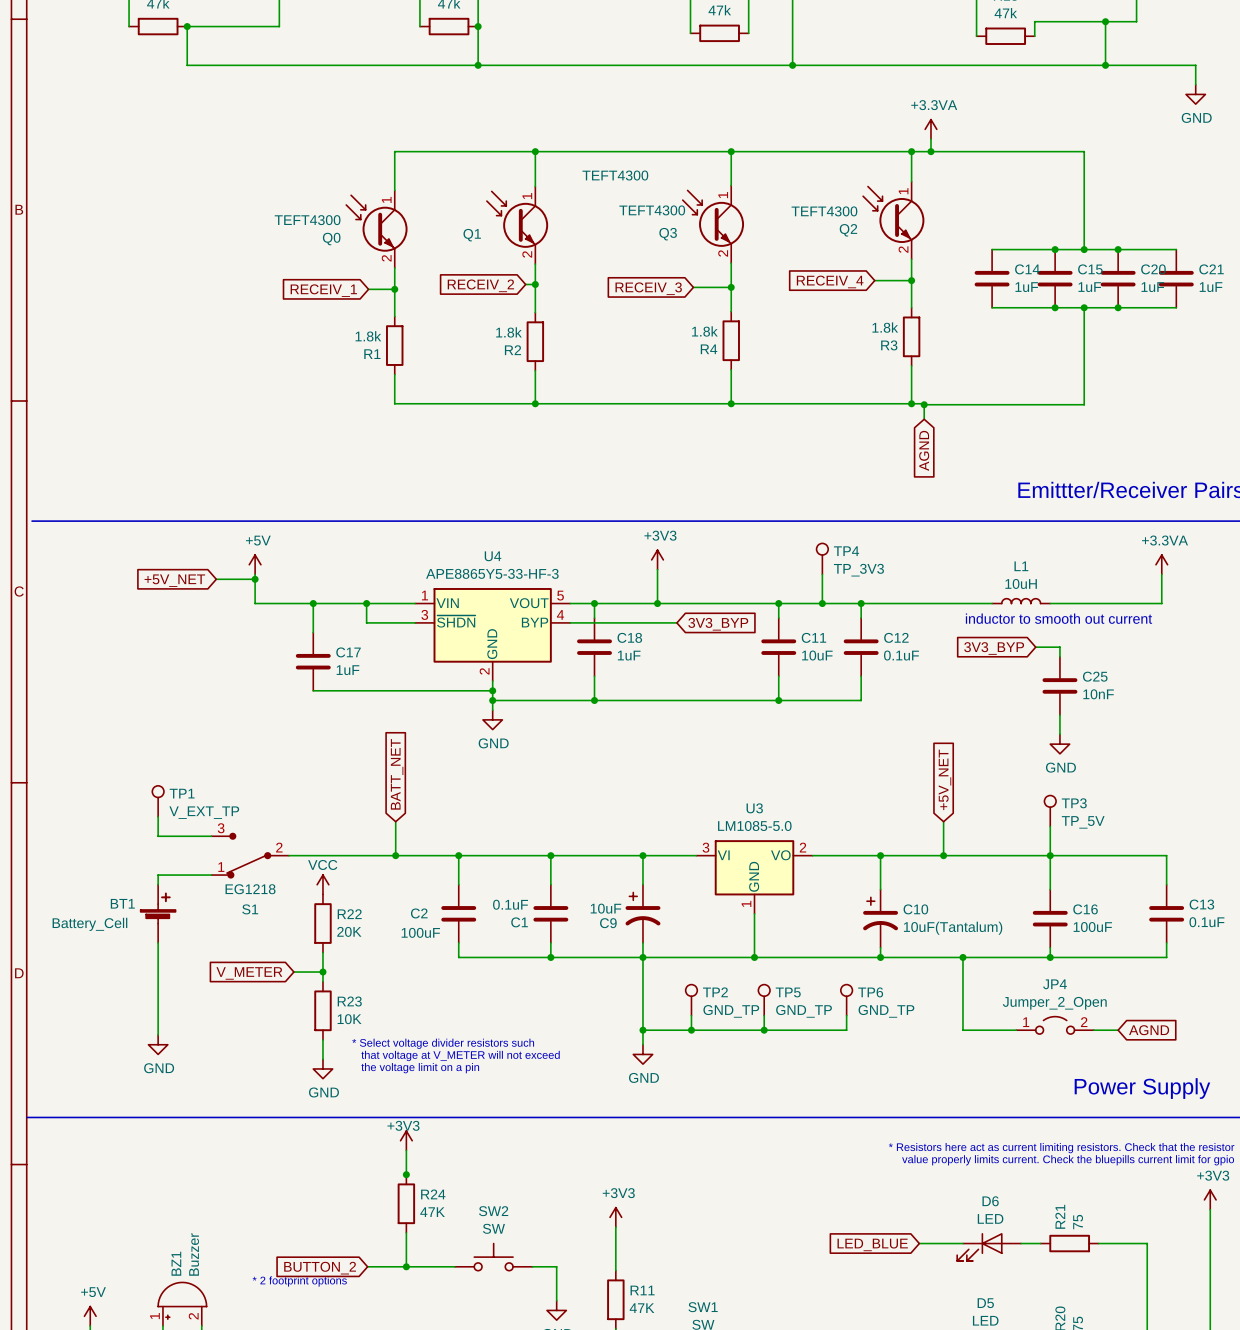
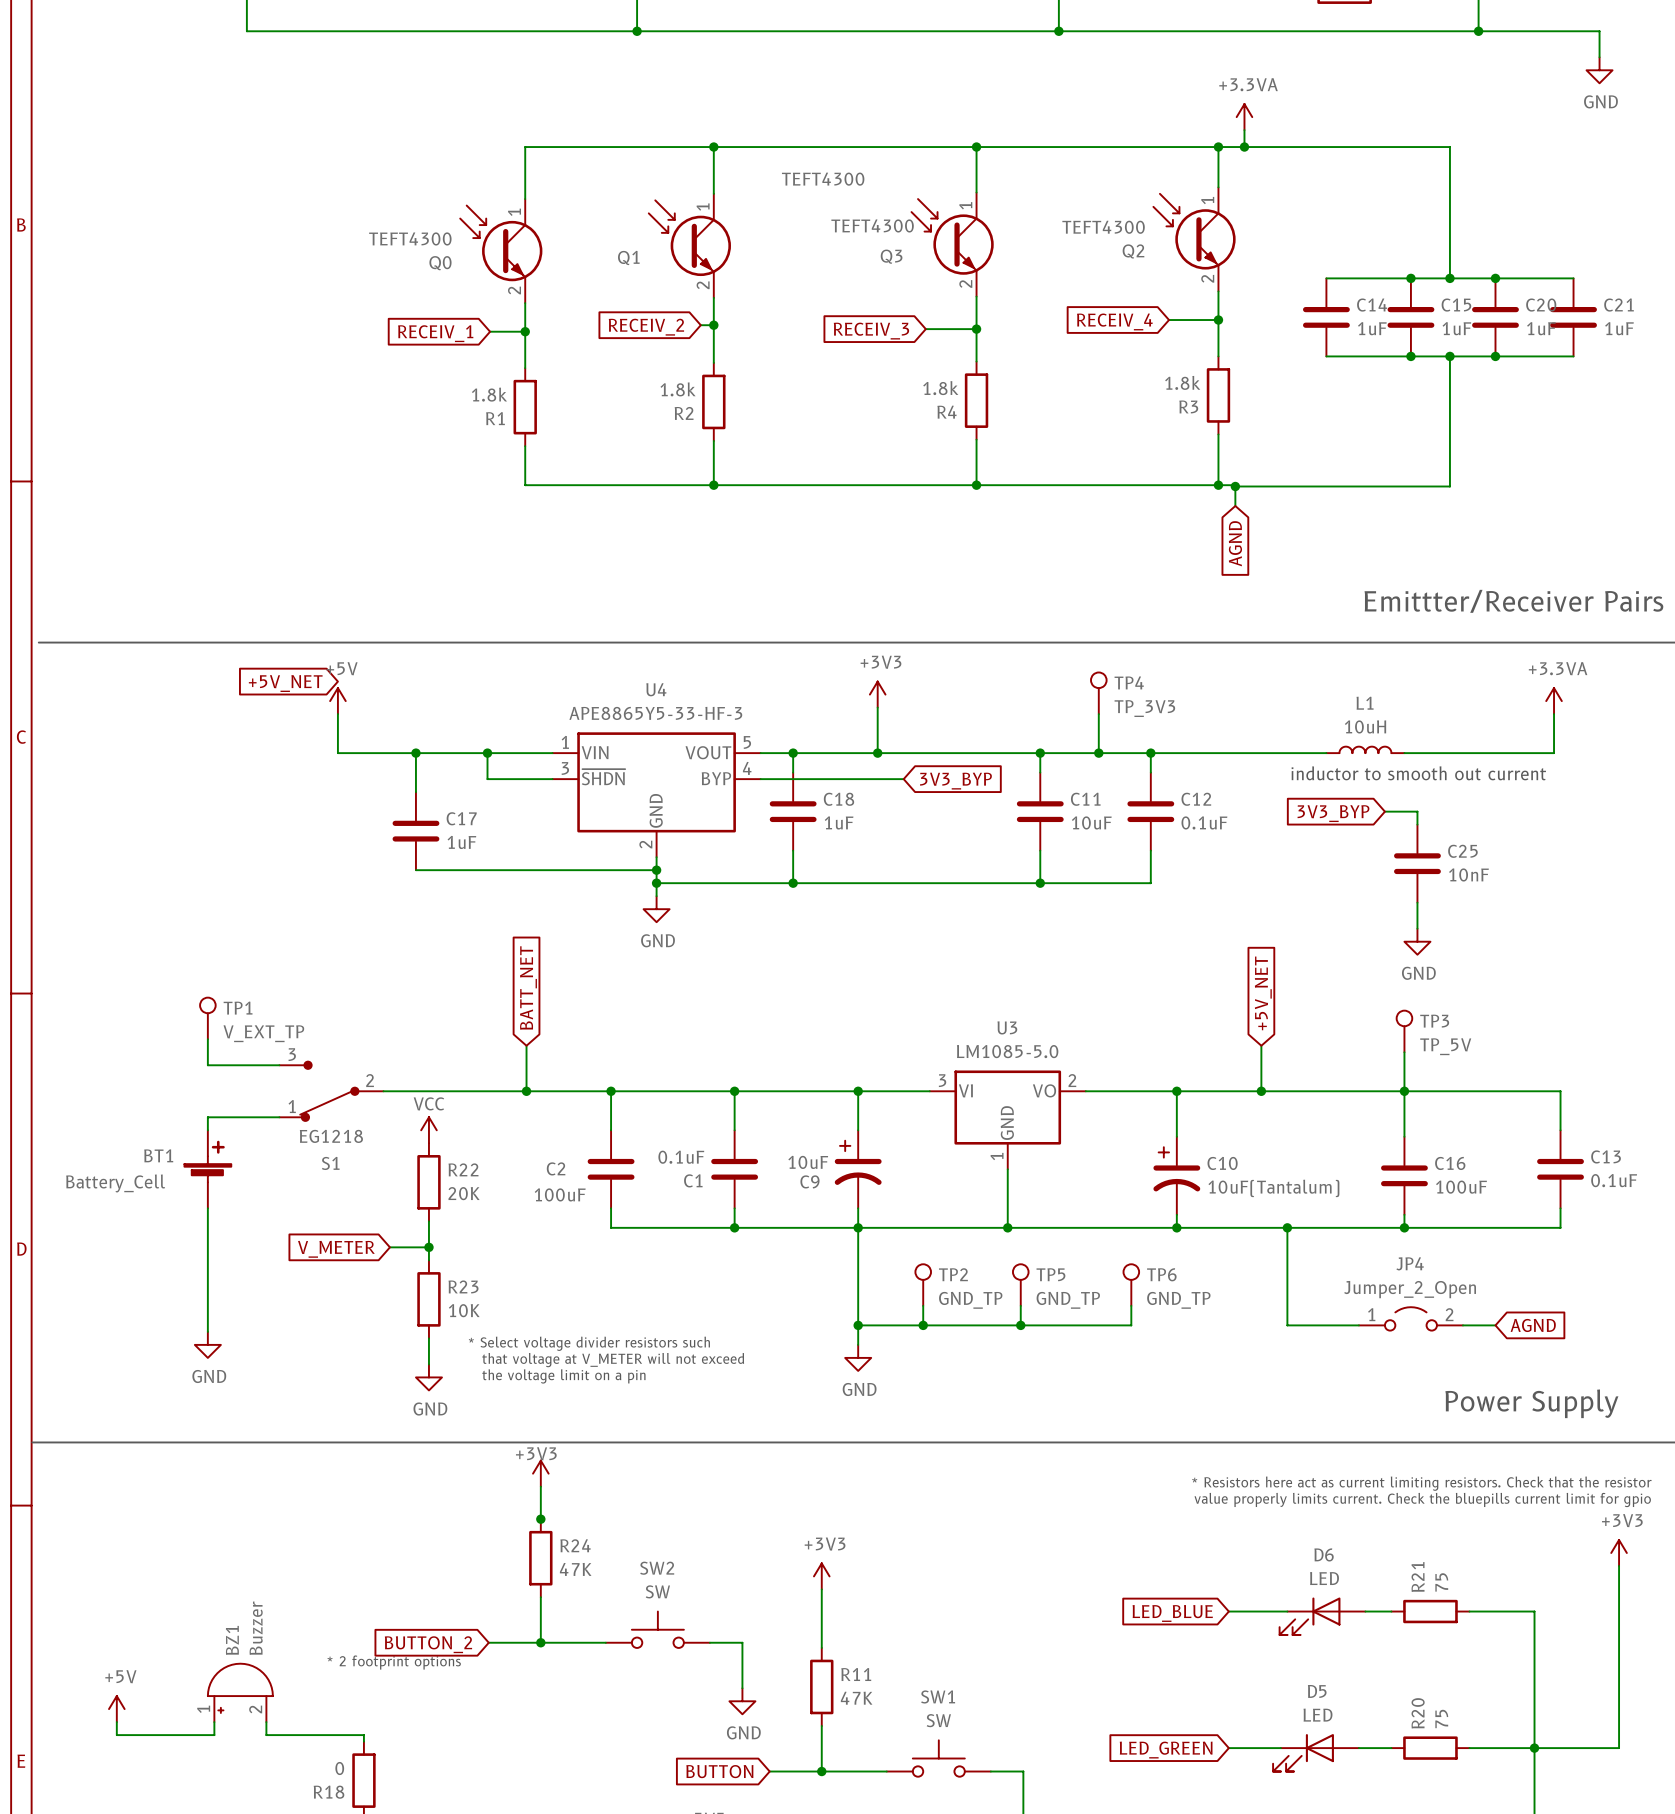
wire: (216, 579) (255, 579) -> none
junction: (255, 579) -> none
global label position: +5V_NET (174, 580) -> +5V_NET (285, 683)

